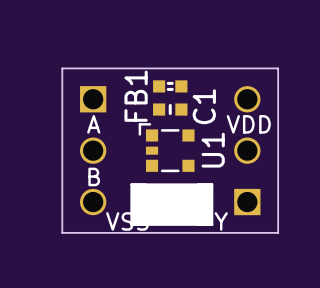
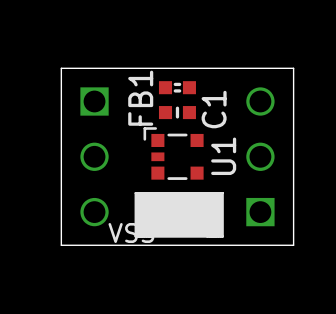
text: A (93, 124) -> none
text: VDD (248, 124) -> none
text: B (94, 176) -> none
text: Y (221, 221) -> none

